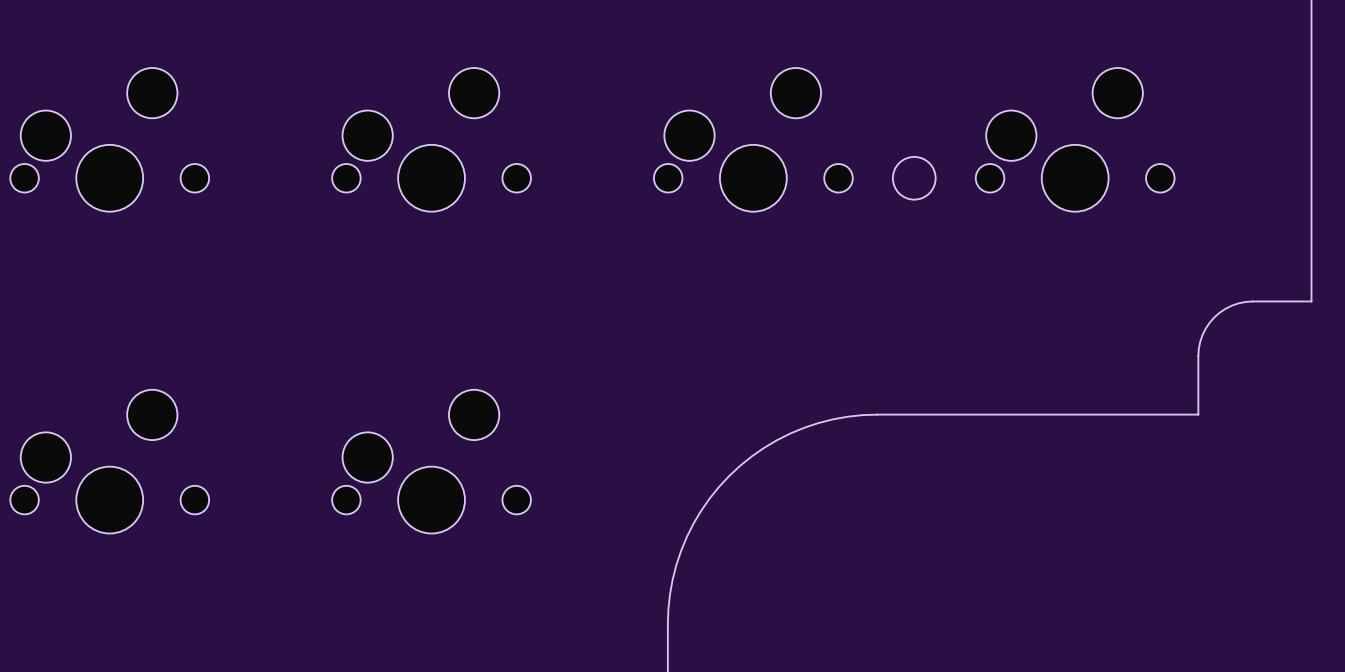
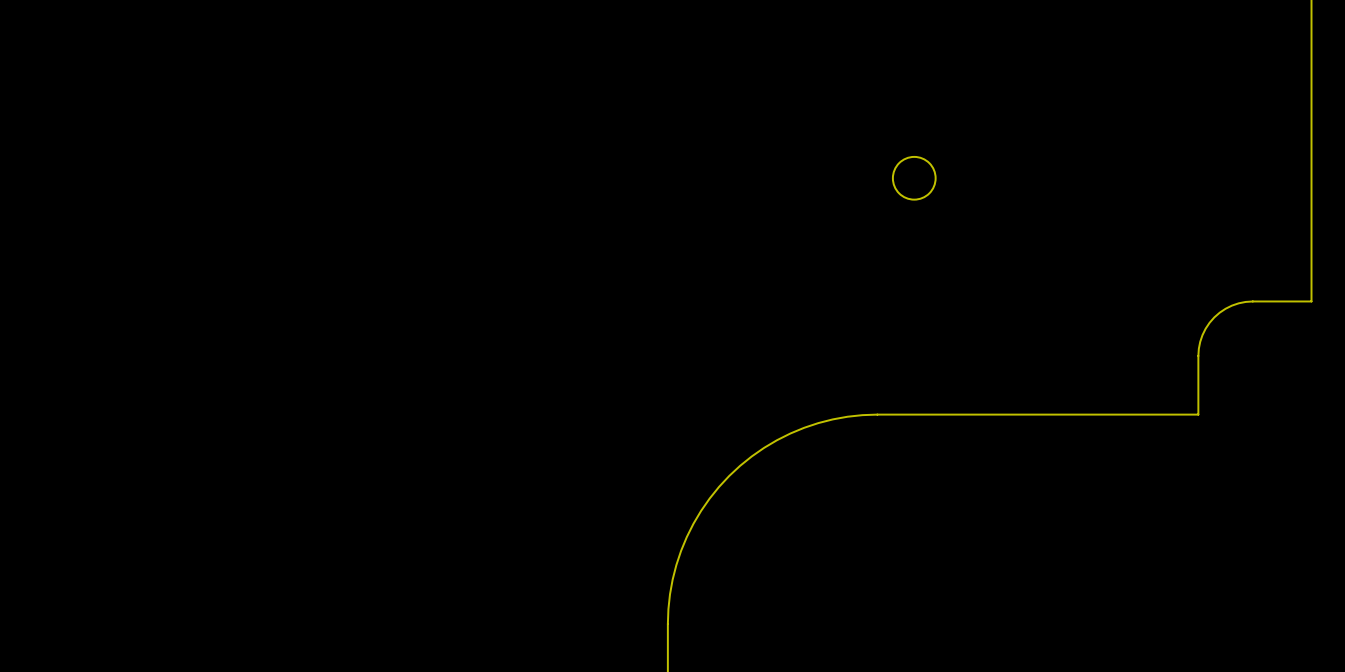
part: (109, 139) -> none
part: (431, 139) -> none
part: (753, 139) -> none
part: (1075, 139) -> none
part: (109, 461) -> none
part: (431, 461) -> none

